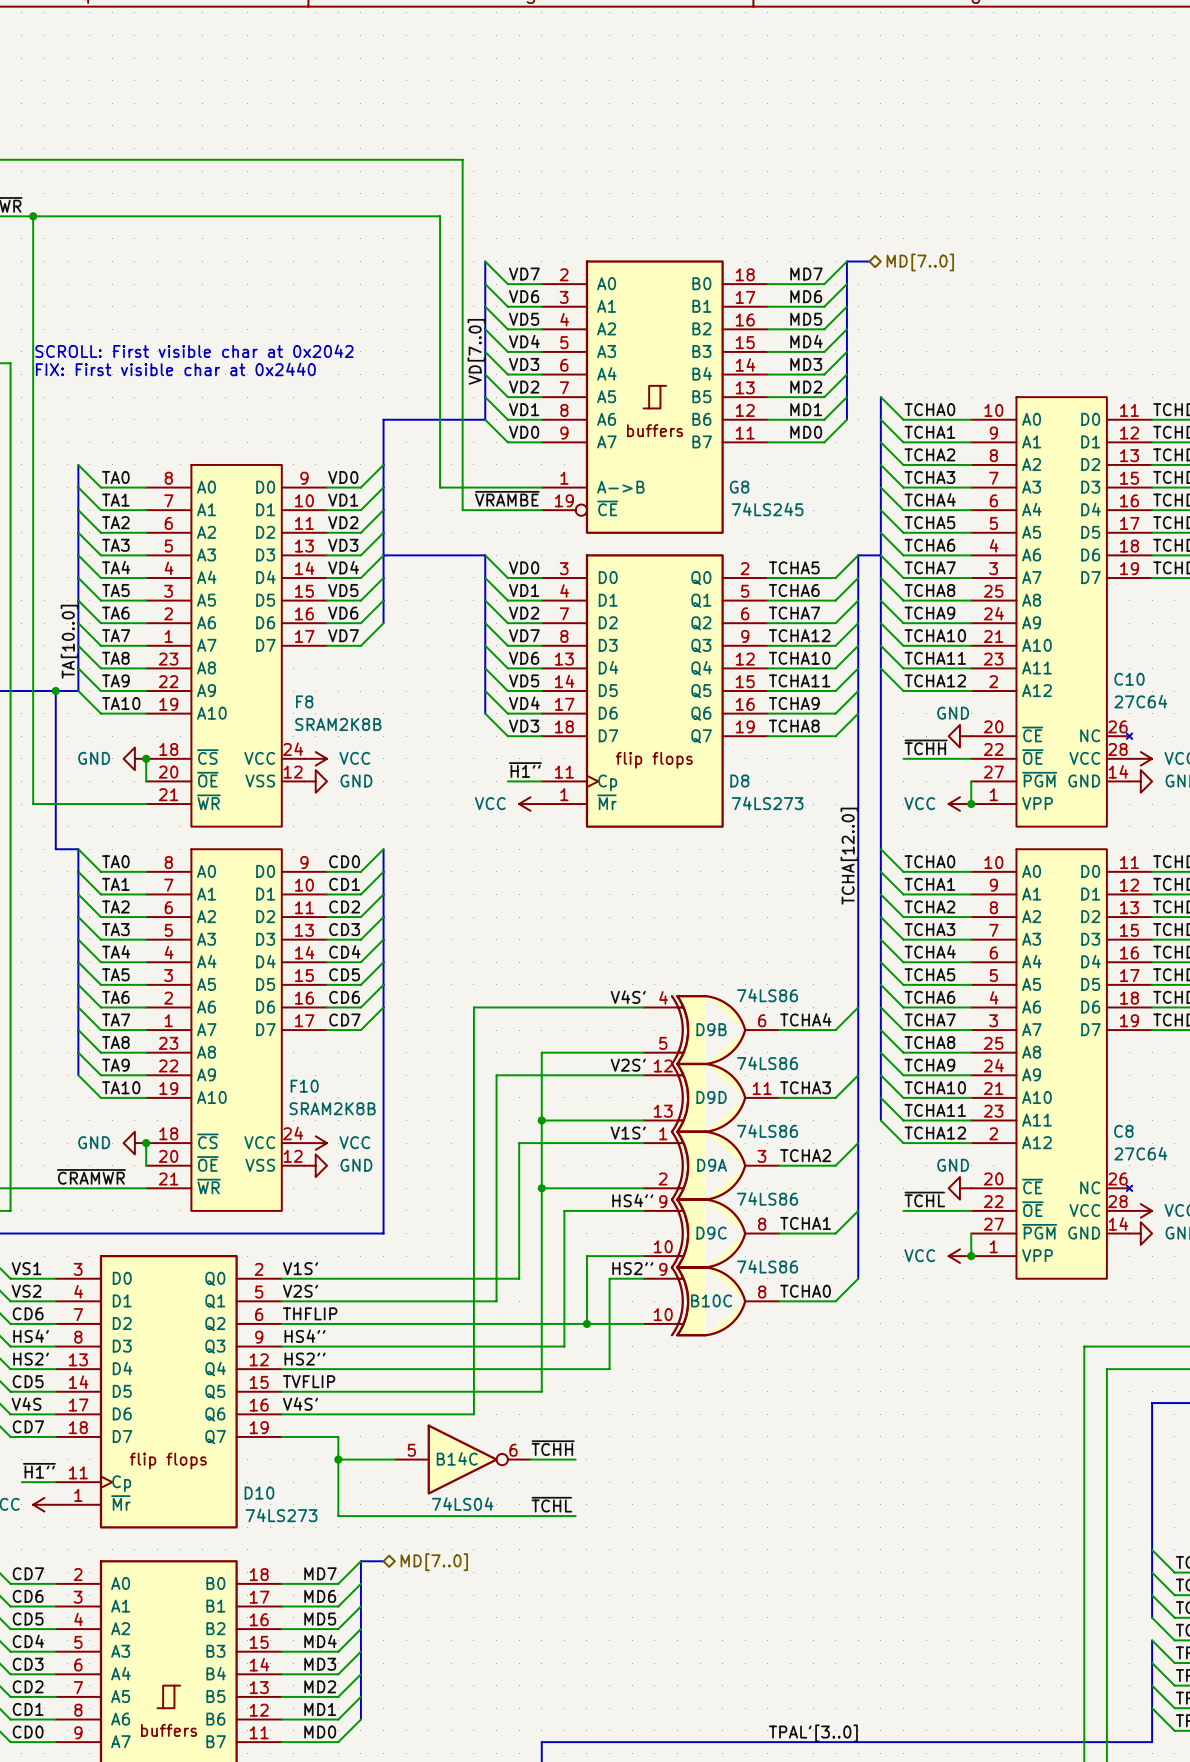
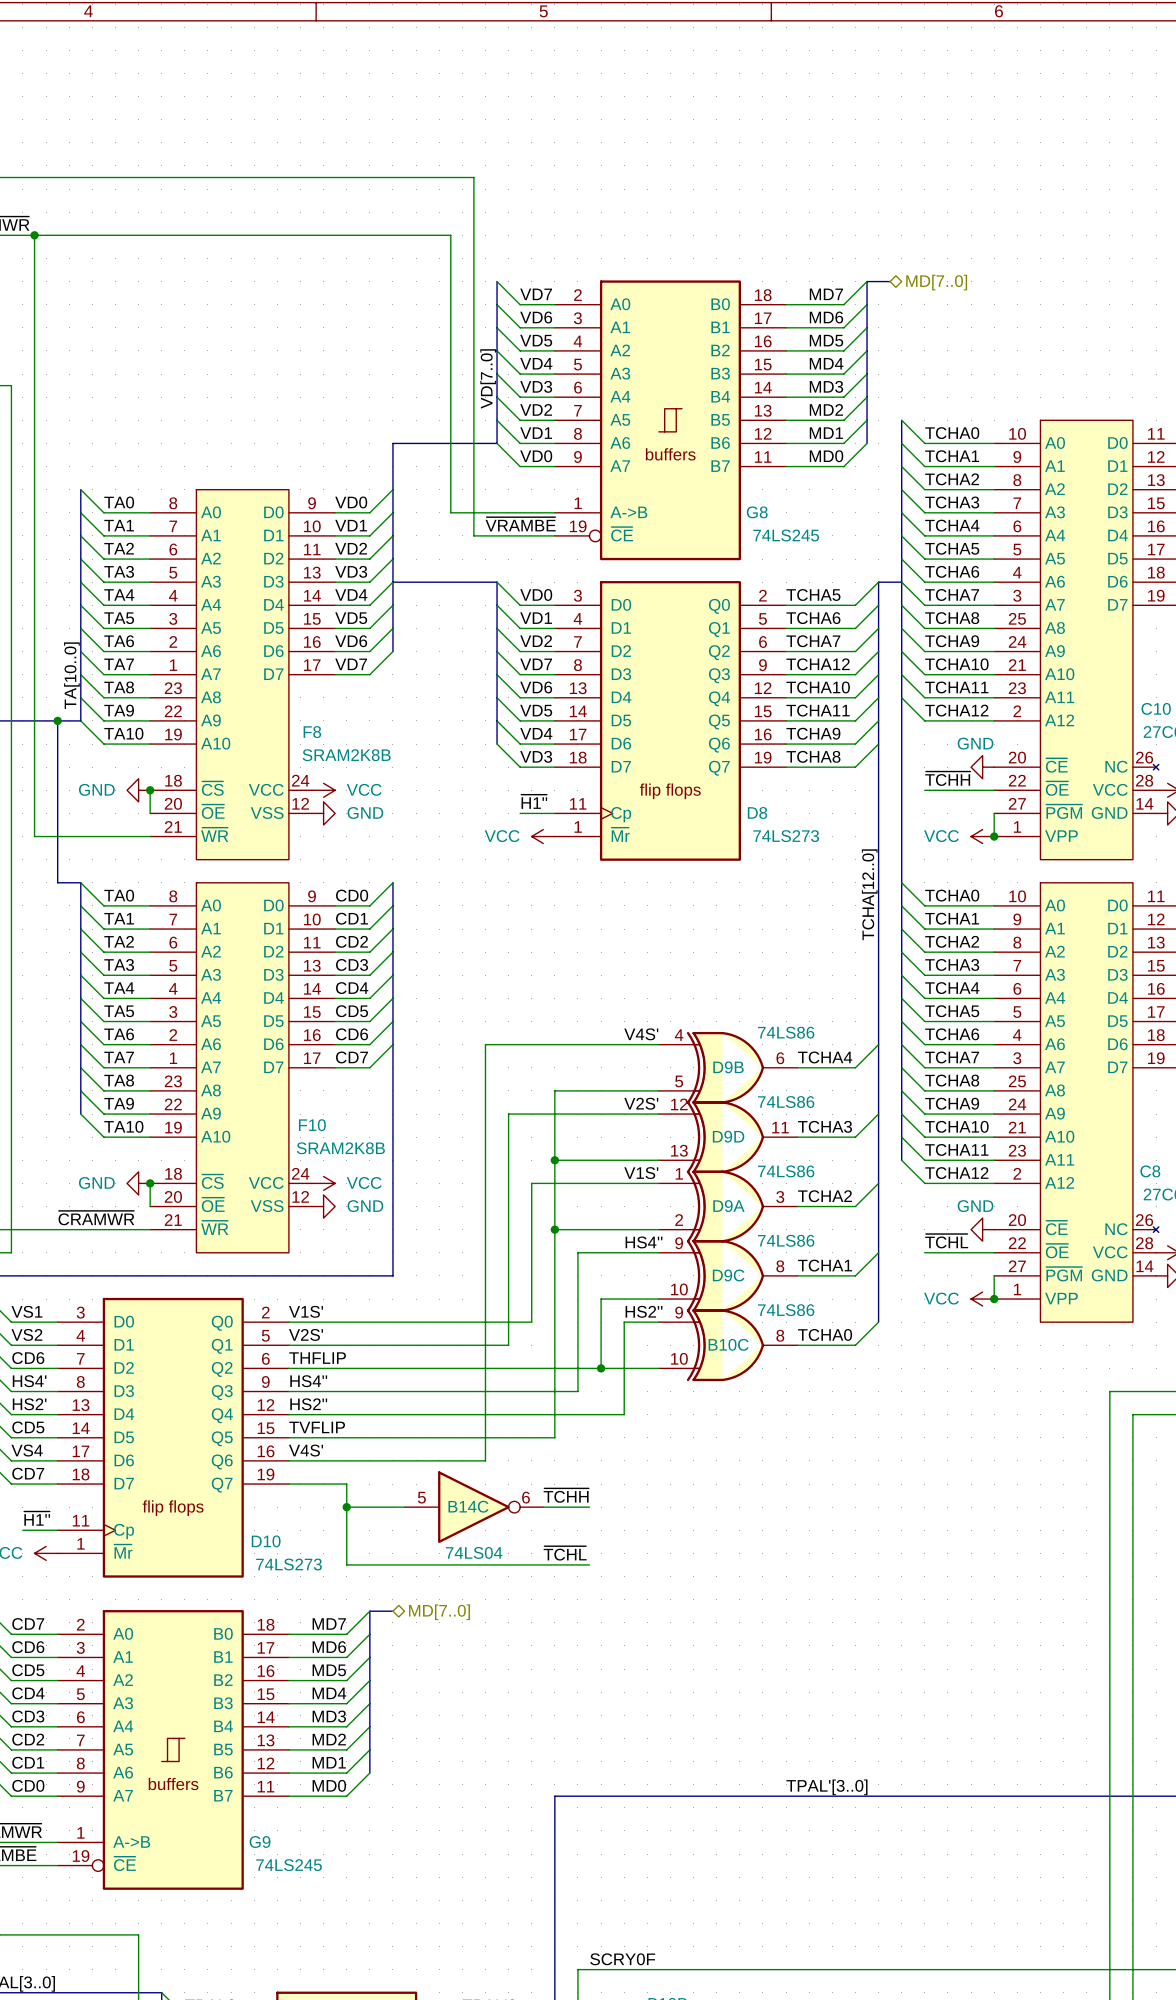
text: SCROLL: First visible char at 0x2042 (194, 351) -> none
text: FIX: First visible char at 0x2440 (175, 369) -> none
label: V4S (26, 1404) -> VS4 (27, 1450)

